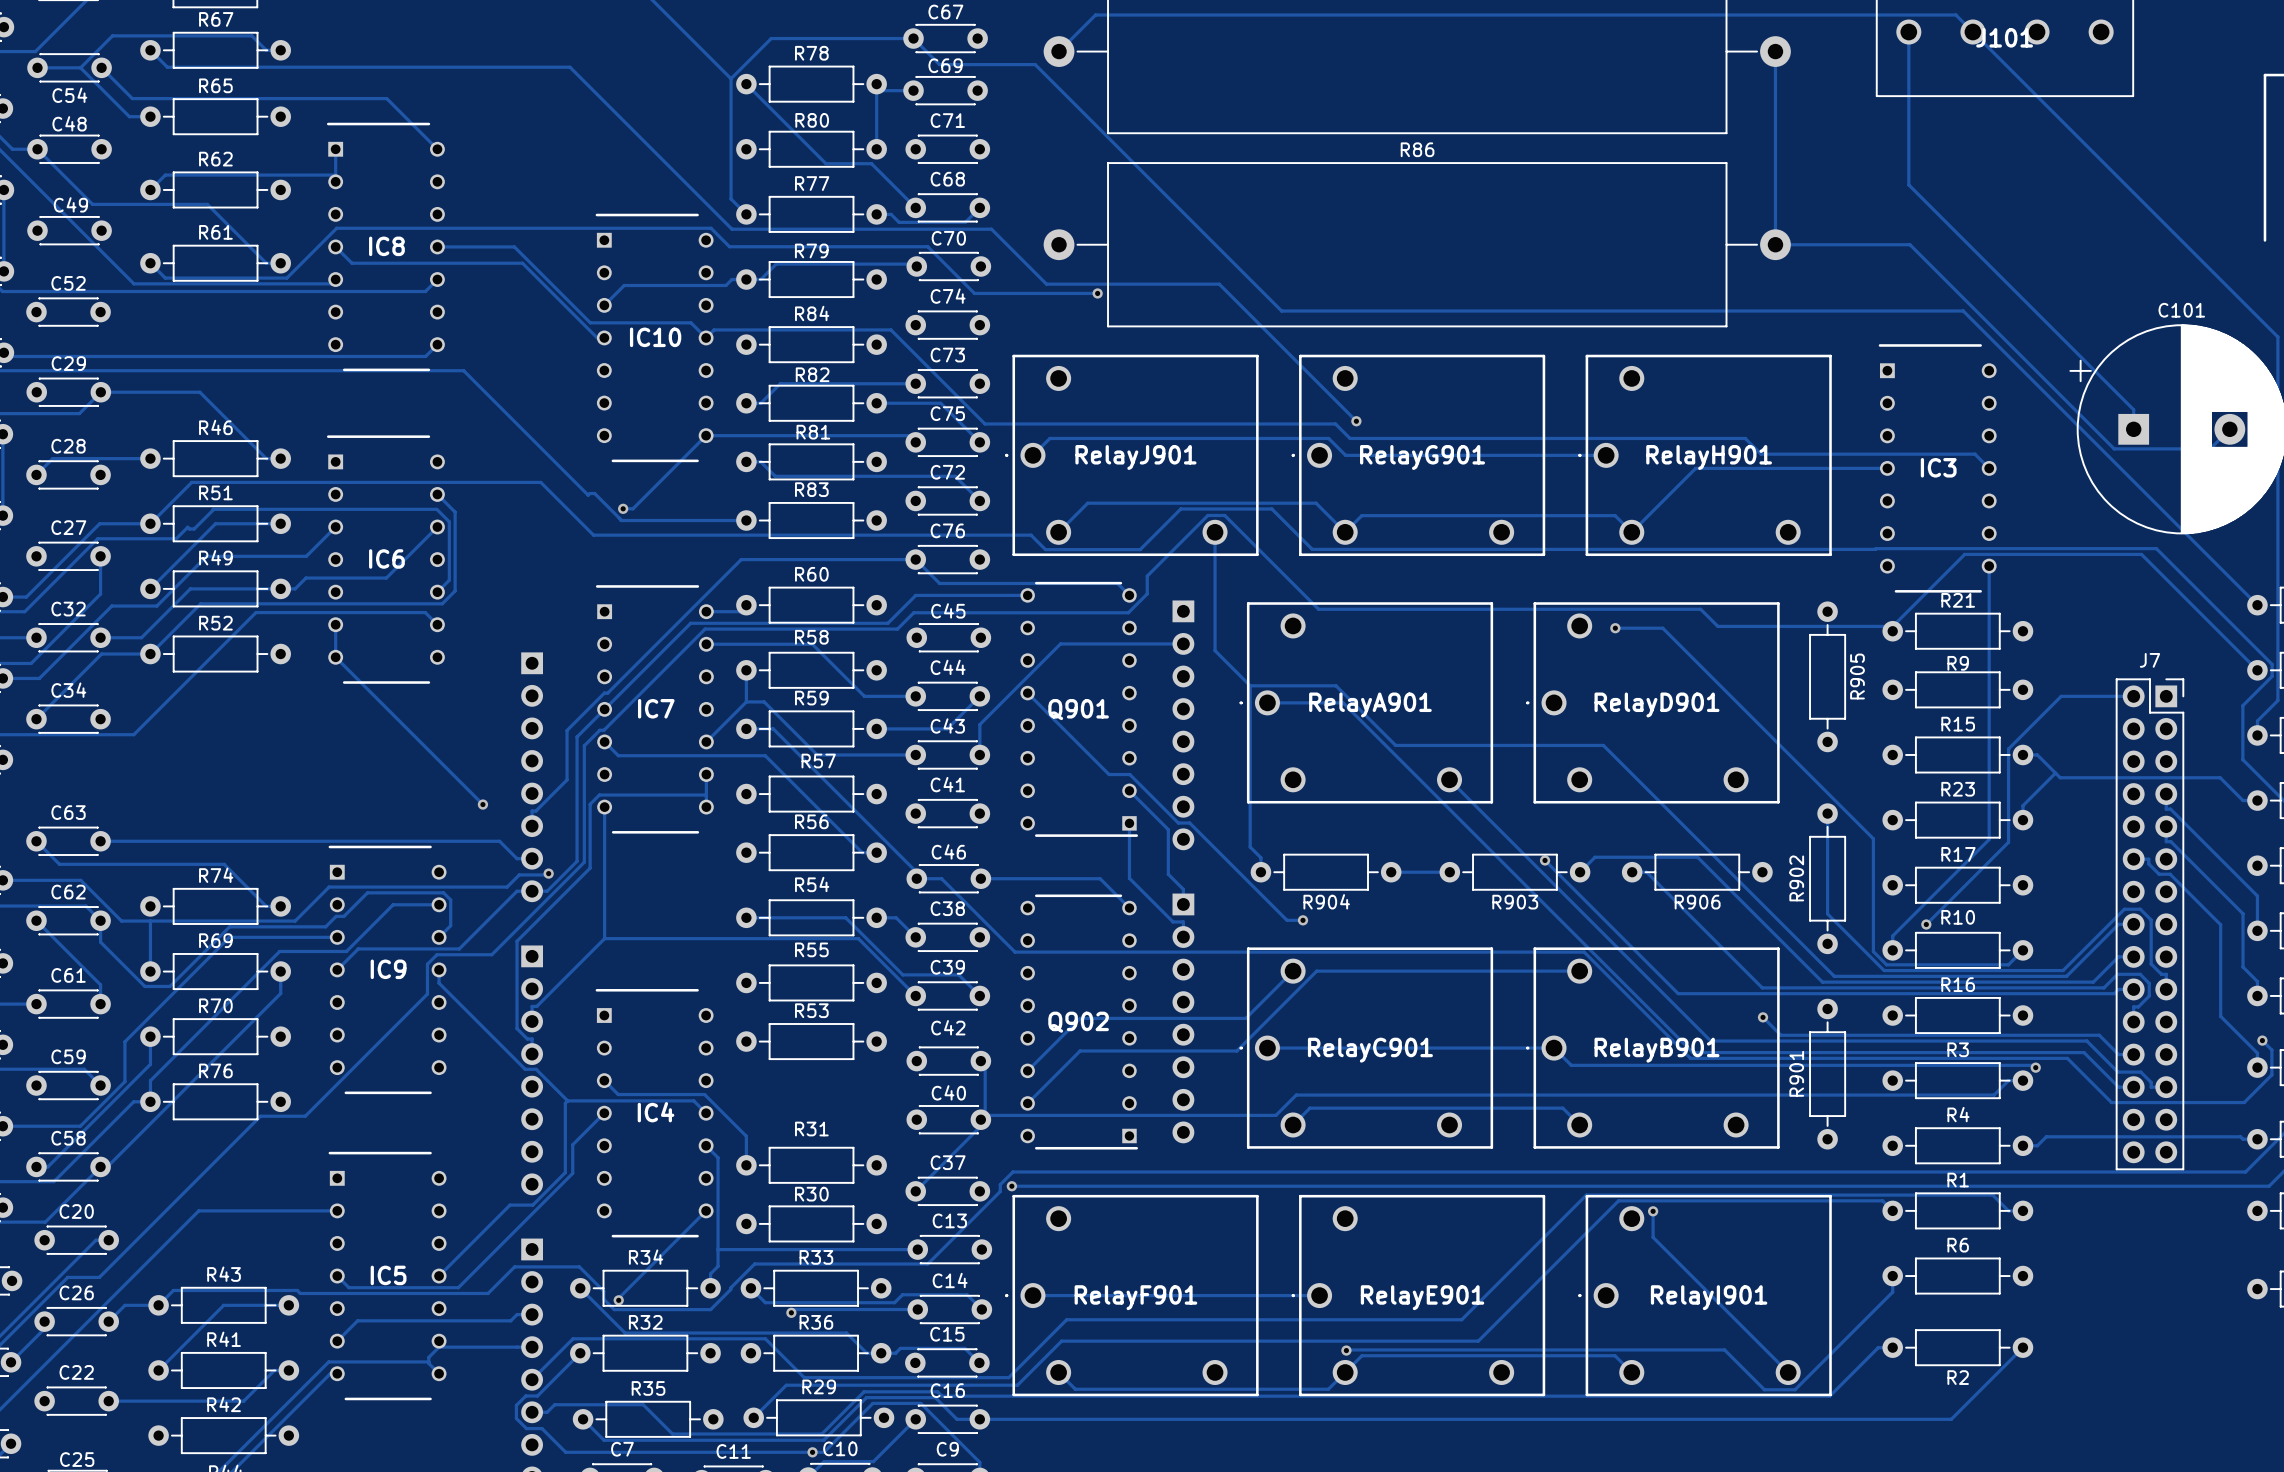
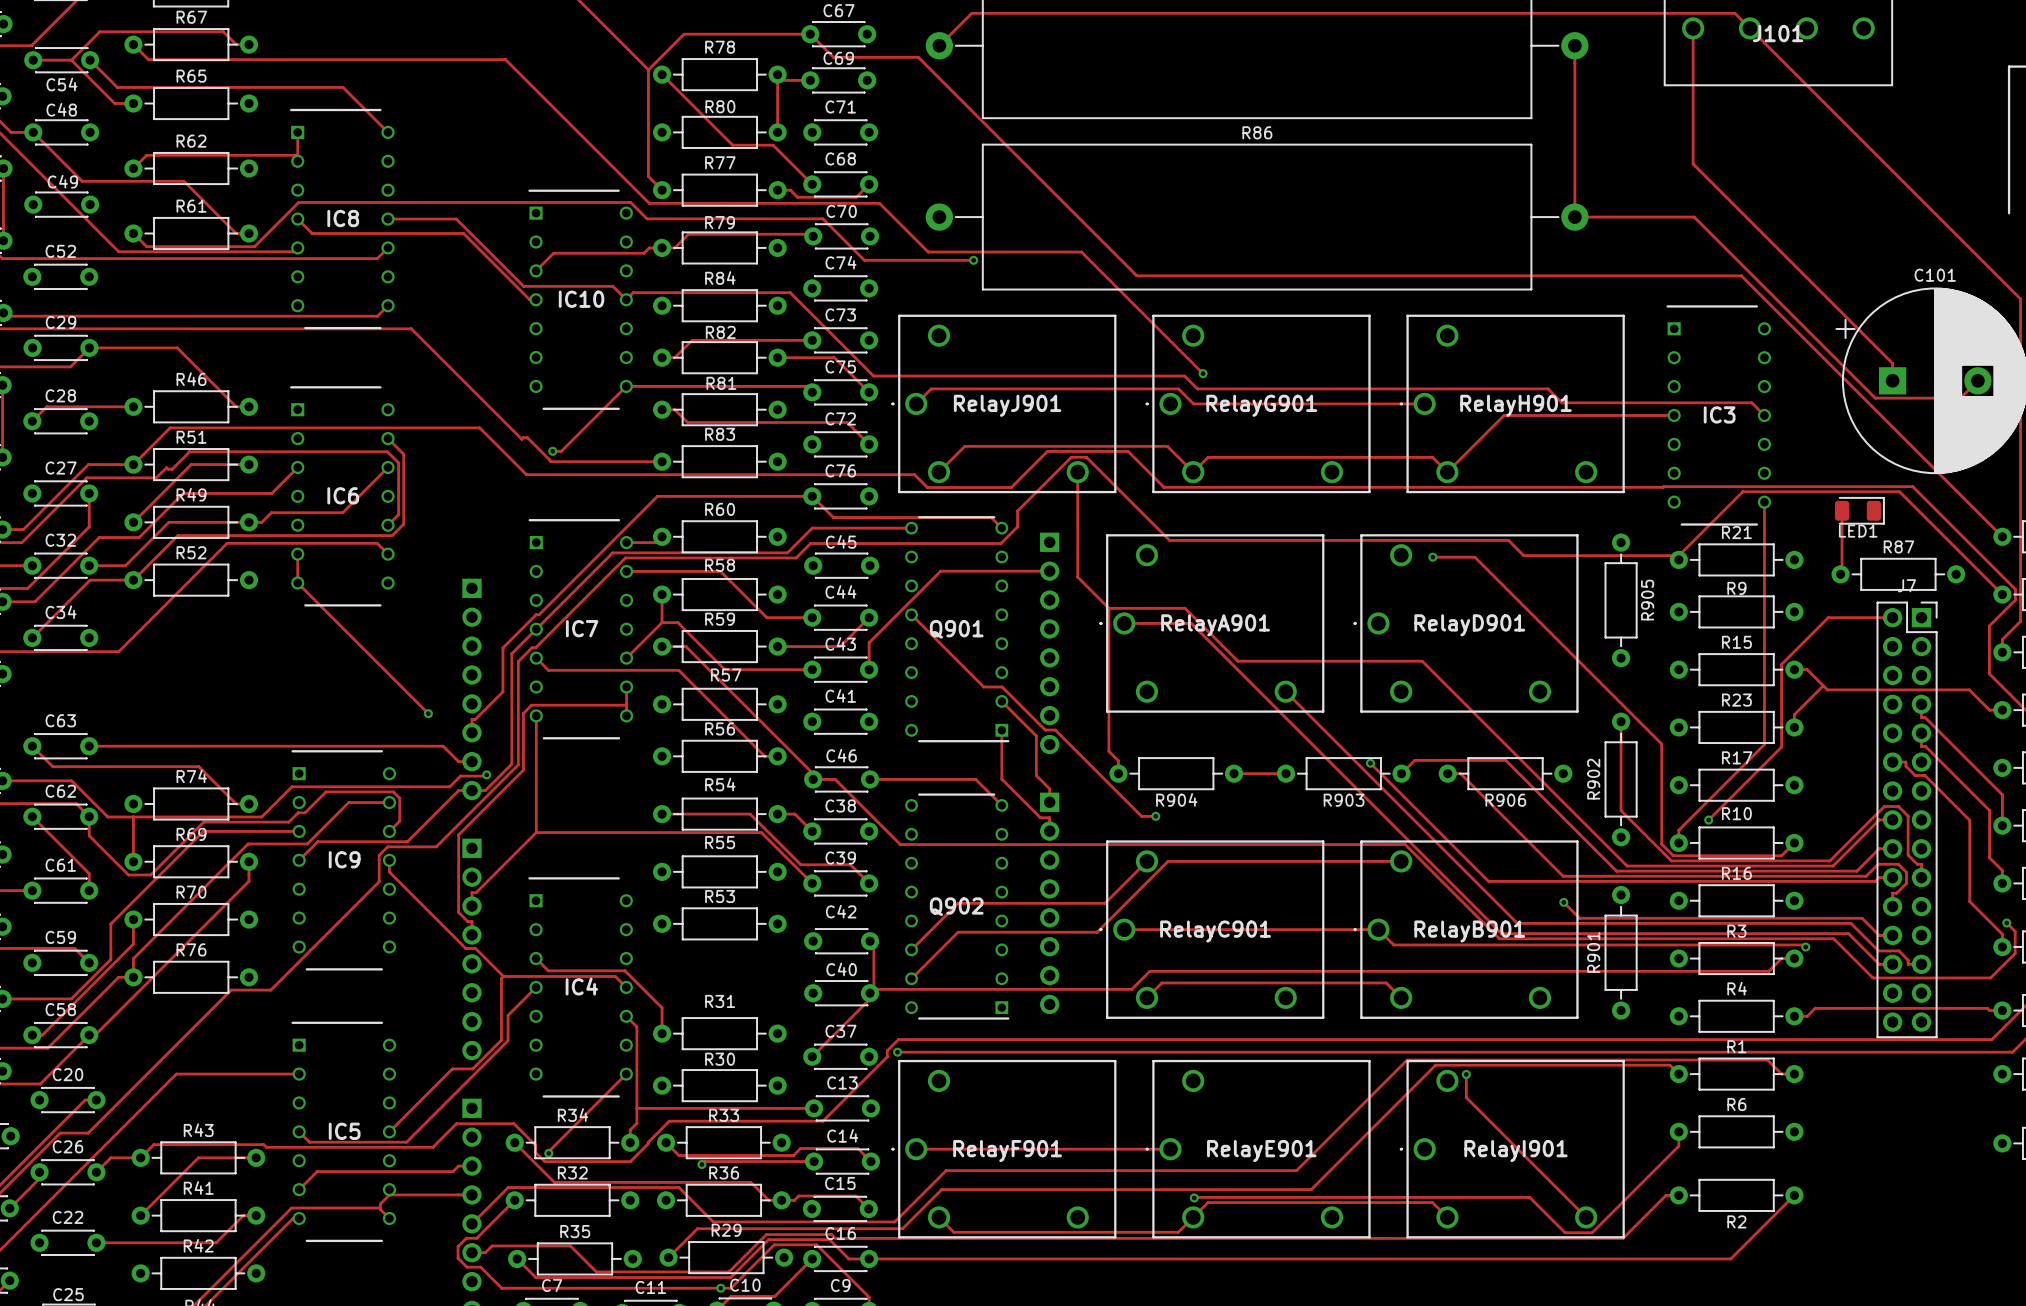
track: none -> (1842, 510) (1840, 574)
LED1: none -> (1859, 510)
R87: none -> (1898, 574)

